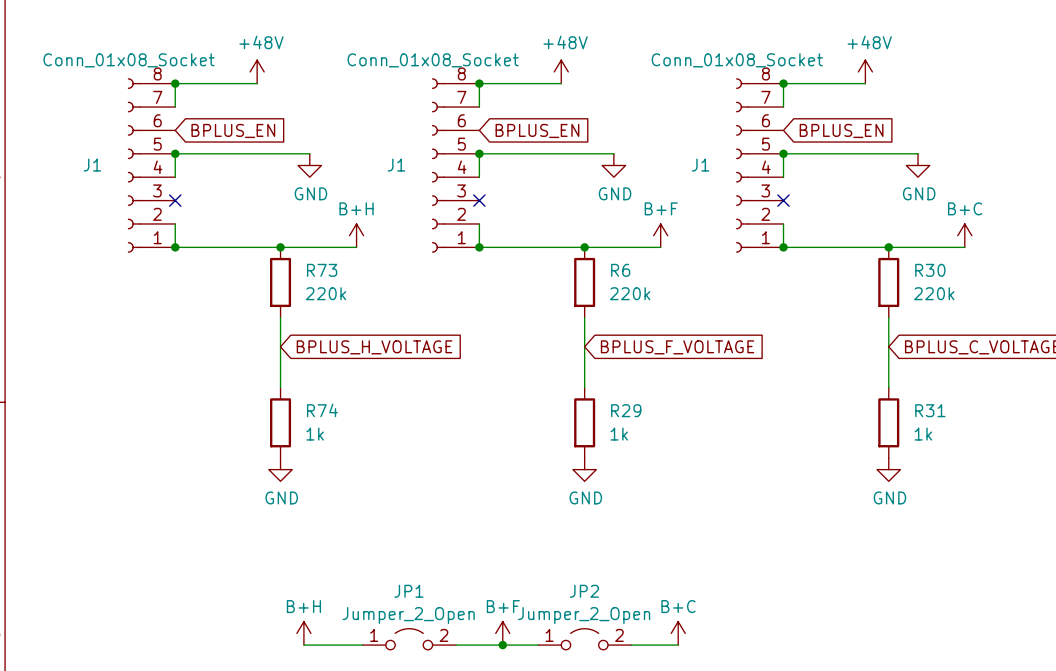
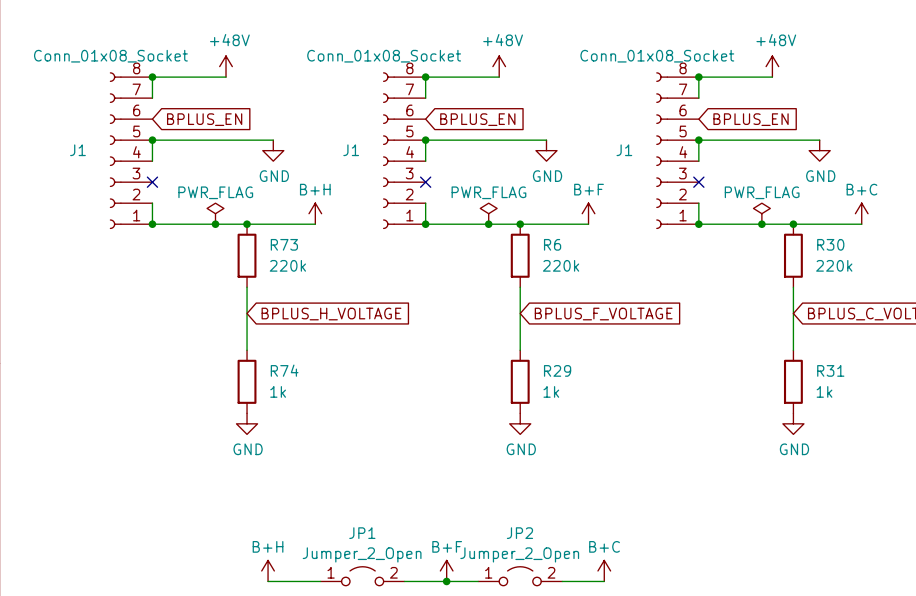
power symbol: none -> PWR_FLAG (215, 213)
power symbol: none -> PWR_FLAG (488, 213)
power symbol: none -> PWR_FLAG (761, 213)
junction: none -> (215, 224)
junction: none -> (488, 224)
junction: none -> (761, 224)

